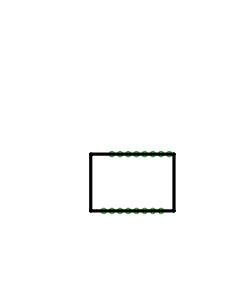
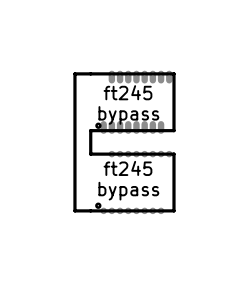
part: none -> (111, 77)
part: none -> (120, 77)
part: none -> (128, 77)
part: none -> (136, 77)
part: none -> (144, 77)
part: none -> (152, 77)
part: none -> (161, 77)
part: none -> (169, 77)
text: none -> ft245 (127, 92)
text: none -> bypass (128, 115)
drawing: none -> [95, 122, 102, 129]
part: none -> (103, 127)
part: none -> (111, 127)
part: none -> (120, 127)
part: none -> (128, 127)
part: none -> (136, 127)
part: none -> (144, 127)
part: none -> (152, 127)
part: none -> (161, 127)
board edge: (90, 154) (90, 210) -> (90, 154) (90, 130) (173, 130) (173, 73) (74, 73) (74, 210) (90, 210)
text: none -> ft245 (127, 168)
text: none -> bypass (128, 191)
drawing: none -> [95, 202, 102, 209]

